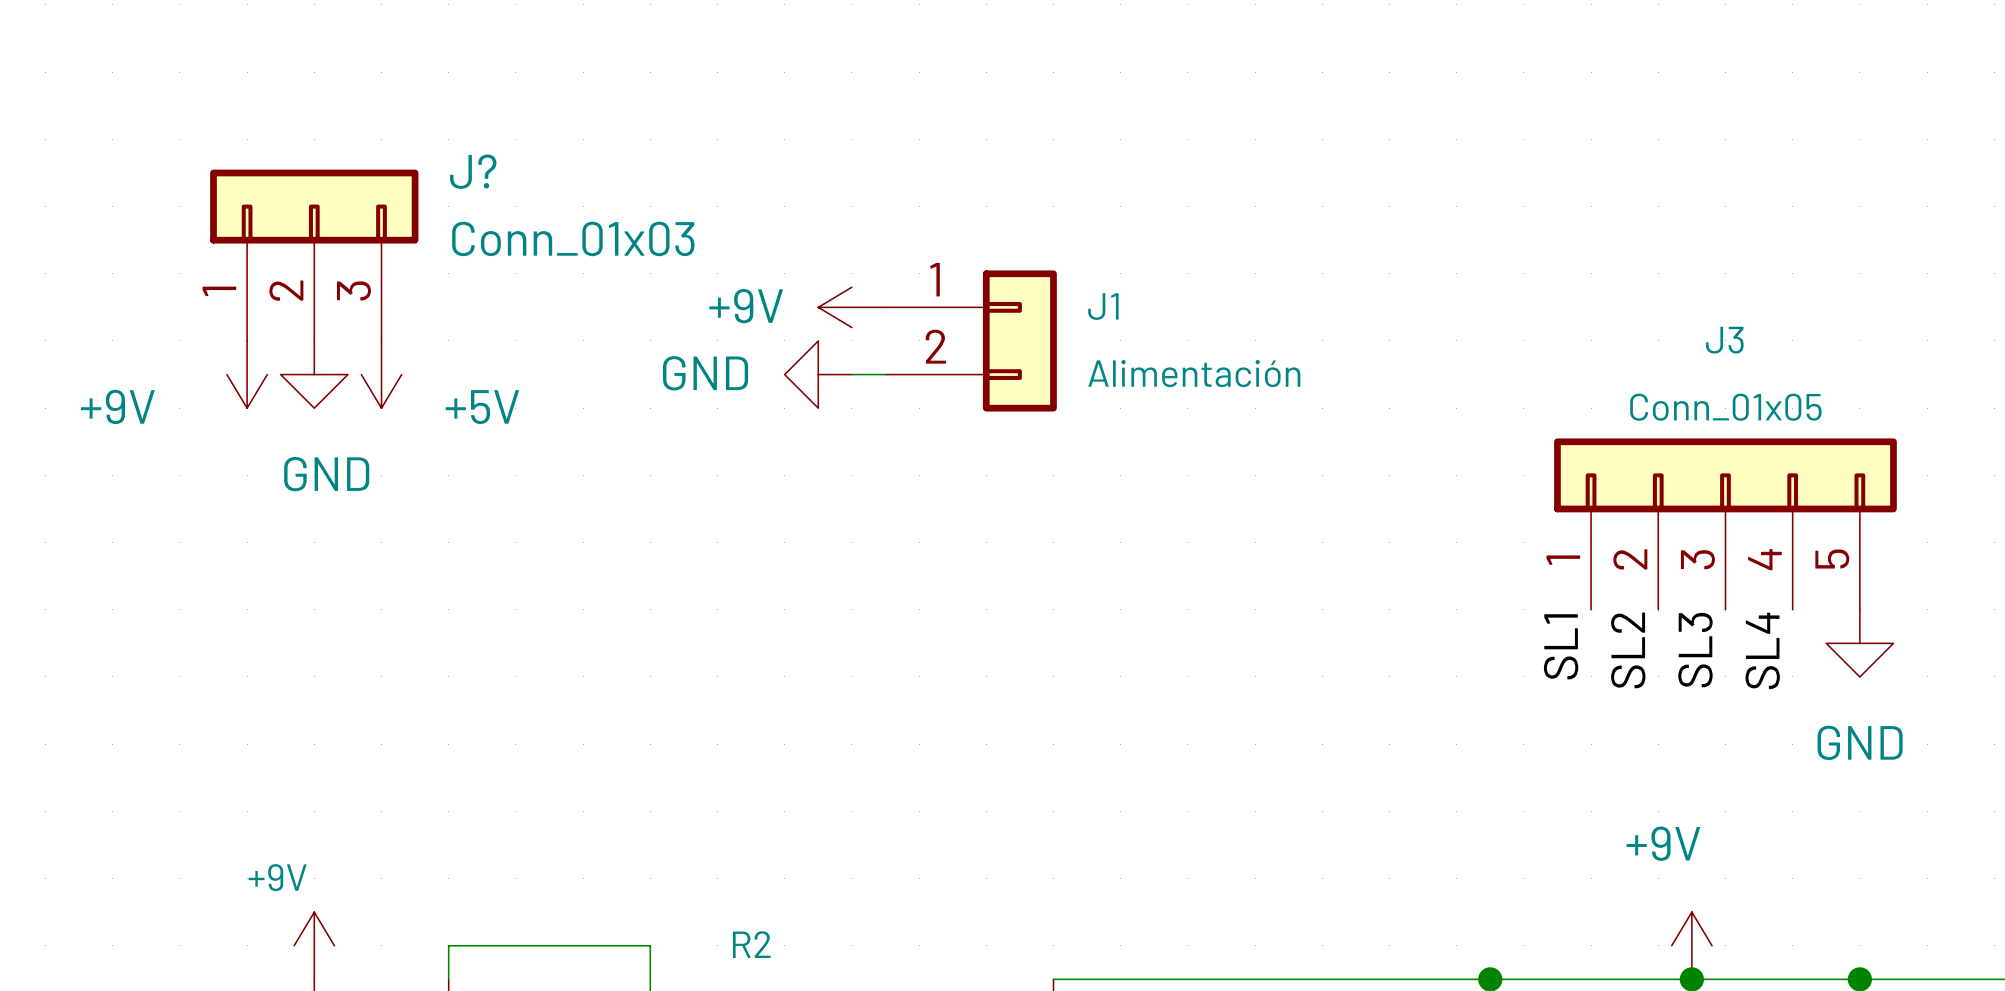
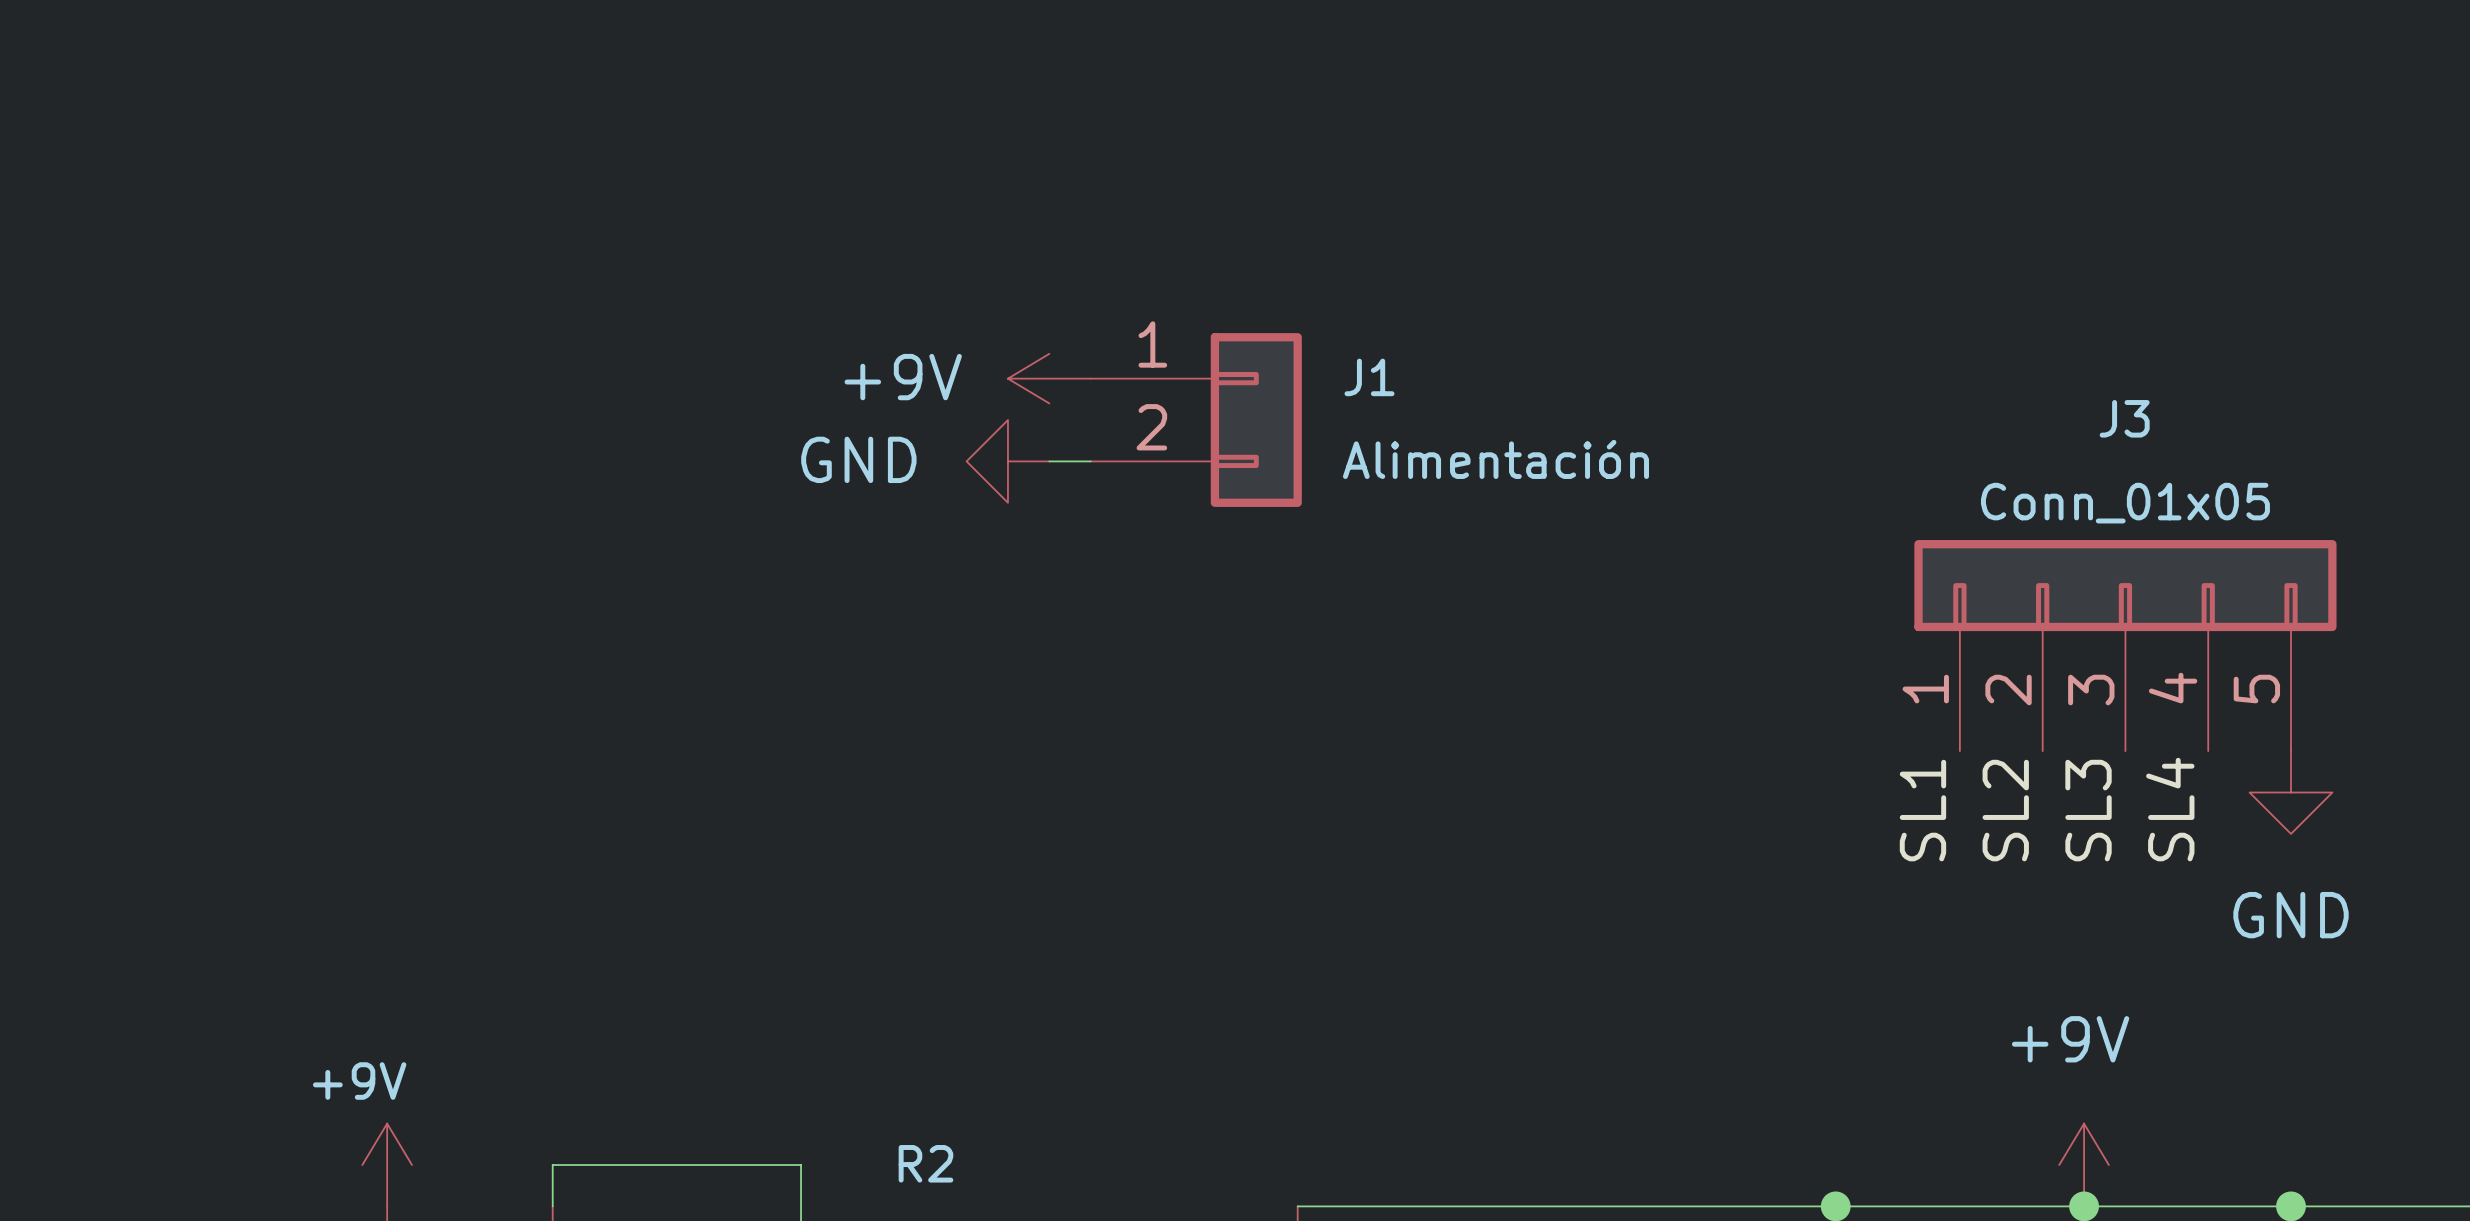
J?: Conn_01x03 (314, 255) -> none
power symbol: +9V (247, 374) -> none
power symbol: GND (314, 374) -> none
power symbol: +5V (381, 374) -> none

